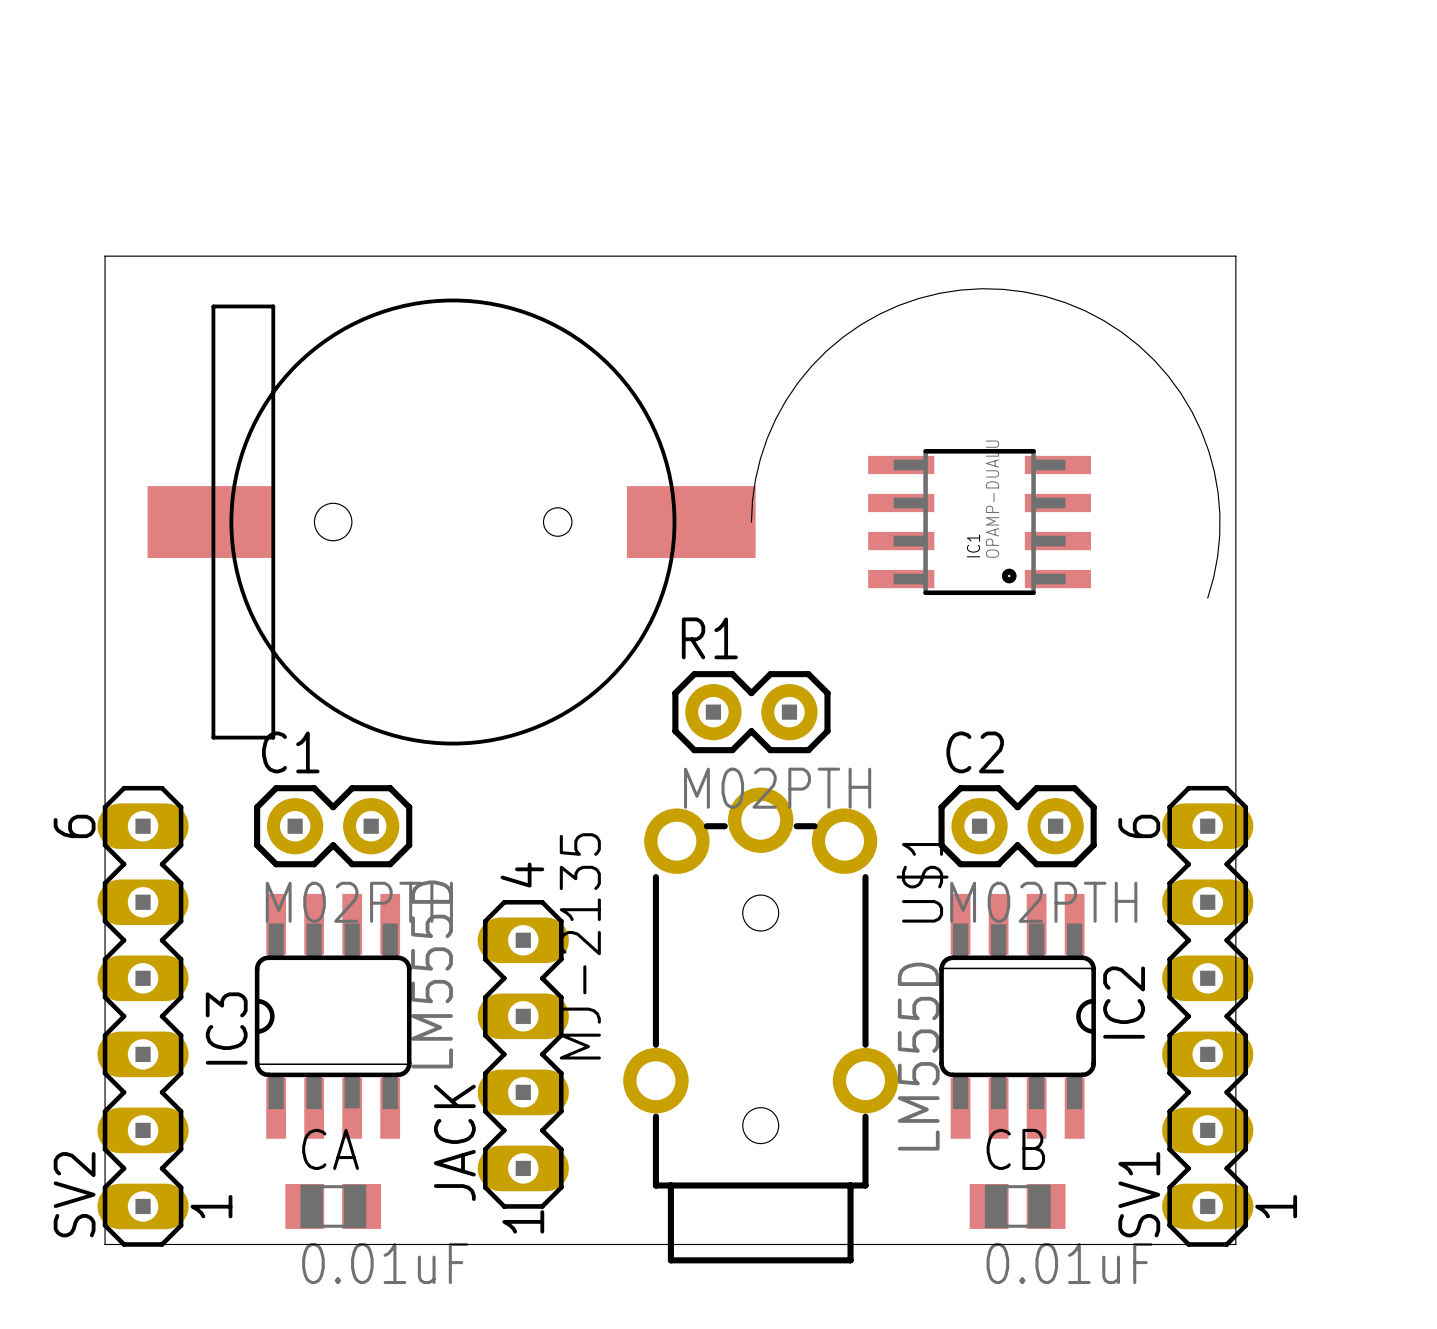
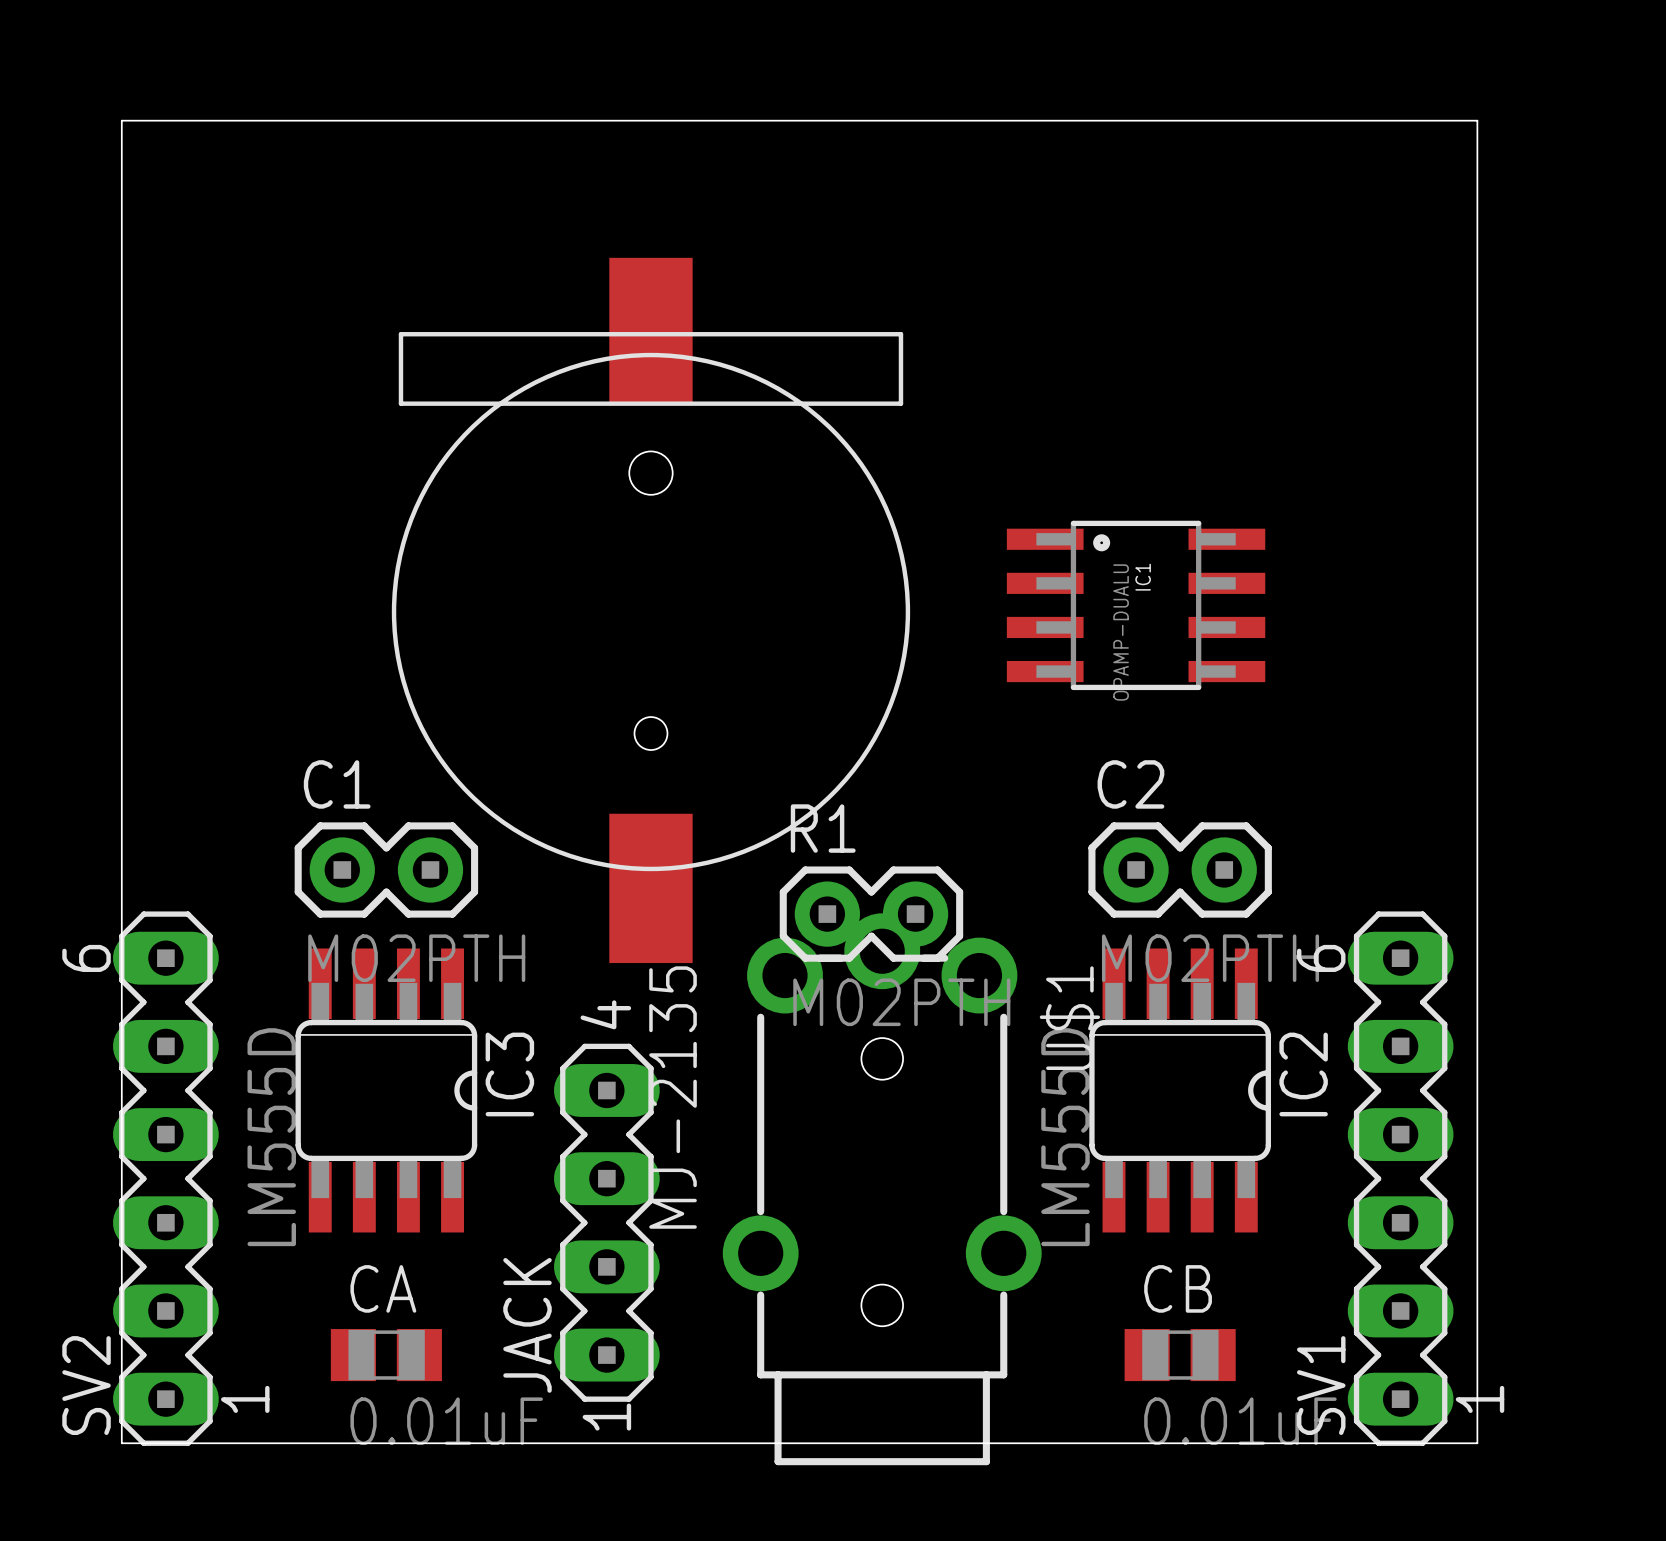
board edge: (105, 256) (1235, 256) (1235, 1244) -> (121, 297) (121, 120) (1477, 120) (1477, 1443) (1433, 1443)
part rotation: 0° (451, 522) -> 90° clockwise (650, 610)
board edge: (751, 522) (755, 479) (767, 438) (775, 419) (798, 382) (826, 350) (860, 325) (898, 305) (918, 298) (960, 290) (981, 288) (1024, 291) (1065, 302) (1104, 320) (1122, 332) (1154, 360) (1181, 393) (1201, 431) (1214, 471) (1218, 492) (1219, 535) (1213, 577) (1207, 598) -> none
IC1 rotation: 0° (979, 522) -> 180° (1136, 605)
R1 position: (751, 712) -> (871, 914)
C1 position: (333, 826) -> (386, 869)
C2 position: (1017, 826) -> (1180, 869)
IC3 rotation: 0° (333, 1016) -> 180° (386, 1090)
IC2 position: (1017, 1016) -> (1180, 1090)
CA position: (333, 1206) -> (386, 1355)
CB position: (1017, 1206) -> (1180, 1355)

